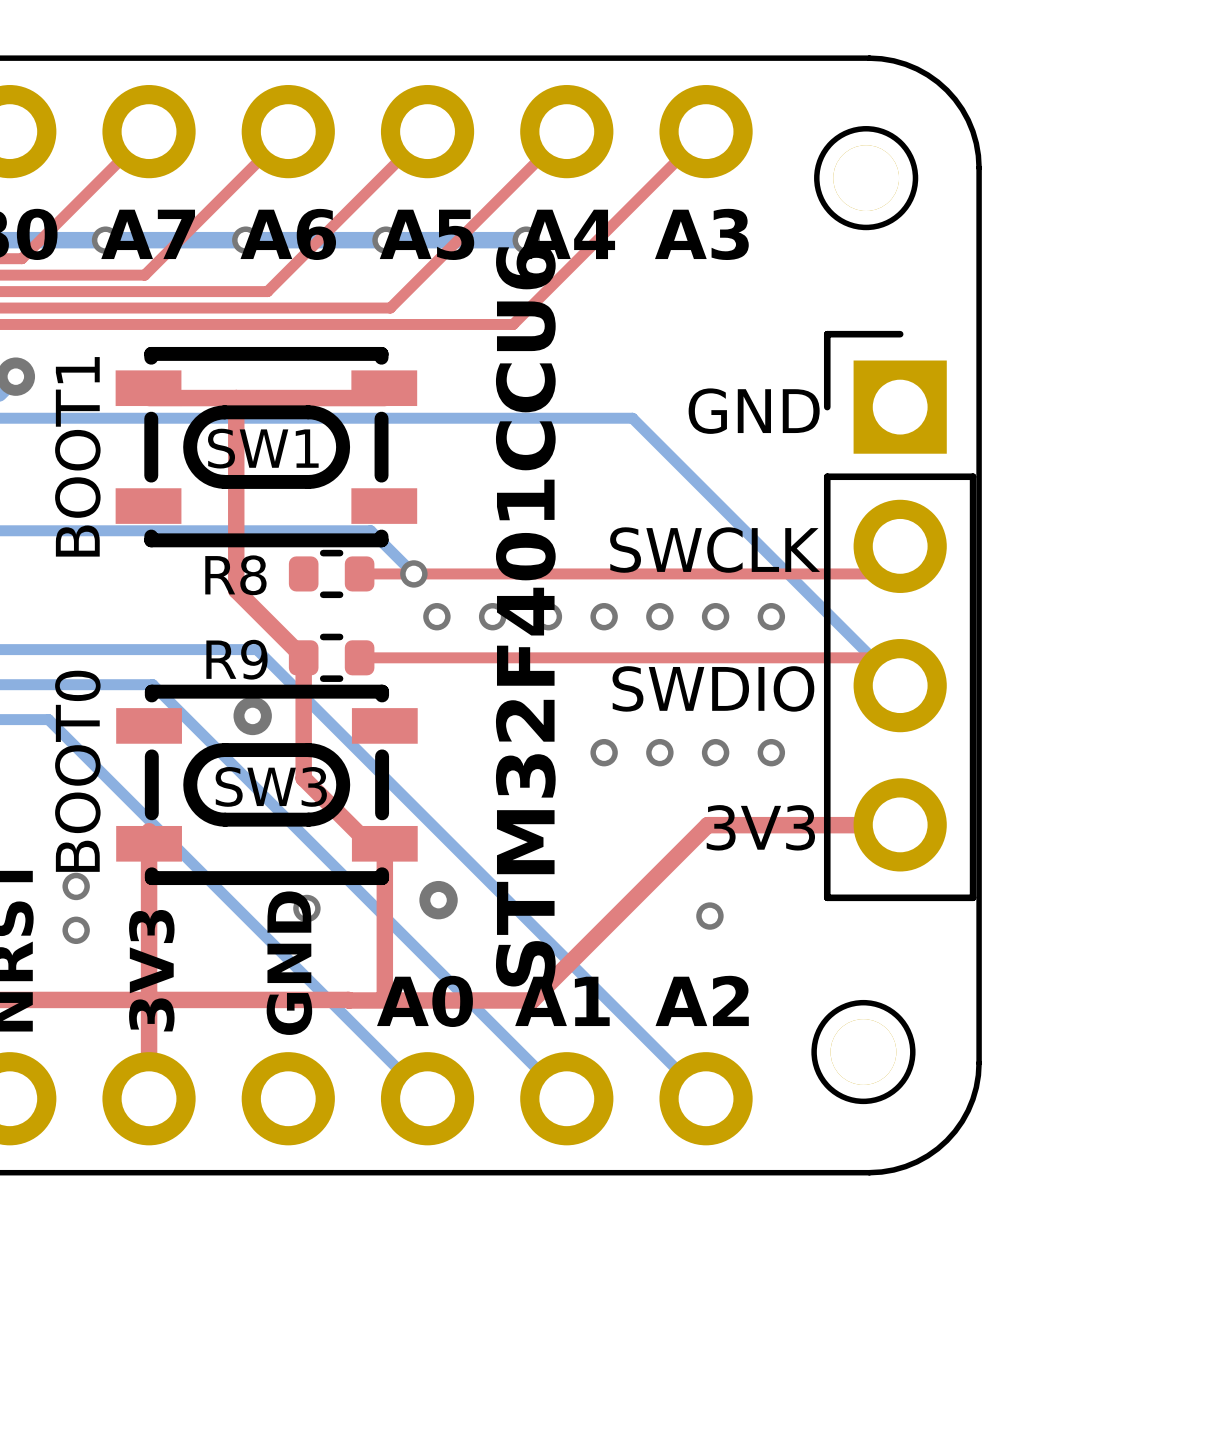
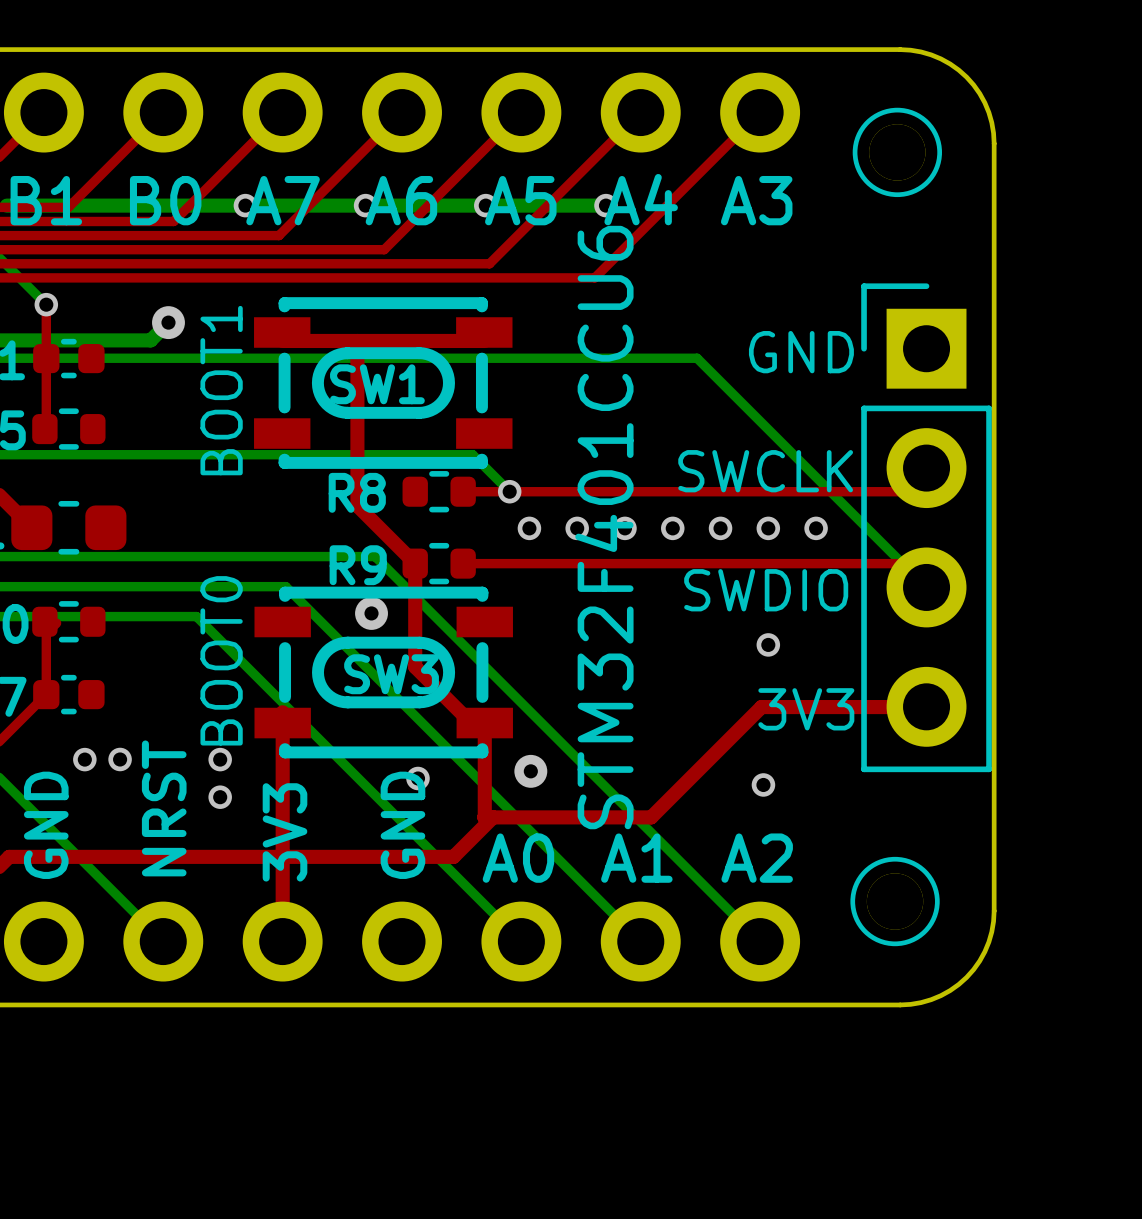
via: (604, 752) -> none
via: (659, 752) -> none
via: (771, 752) -> none
top track: (384, 953) (384, 999) -> none
top track: none -> (493, 817) (453, 856)
top track: (578, 953) (532, 1000) (349, 1000) -> (651, 817) (484, 817)

